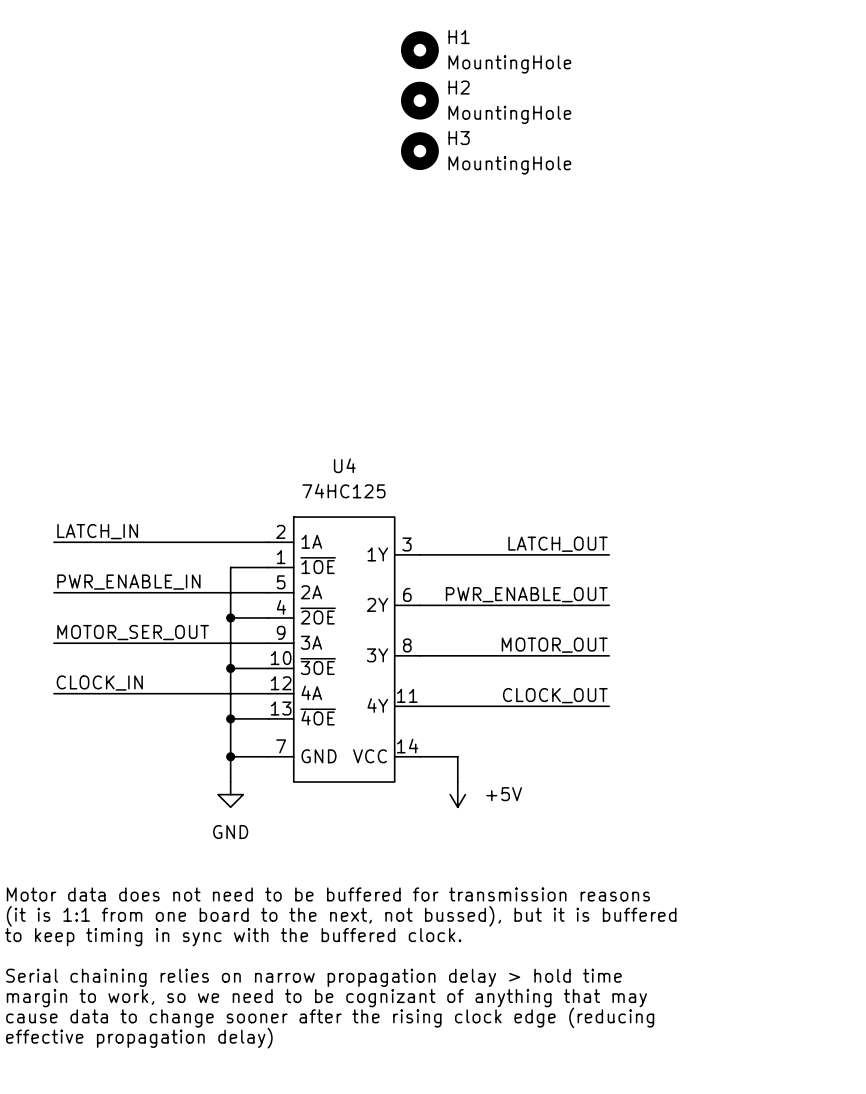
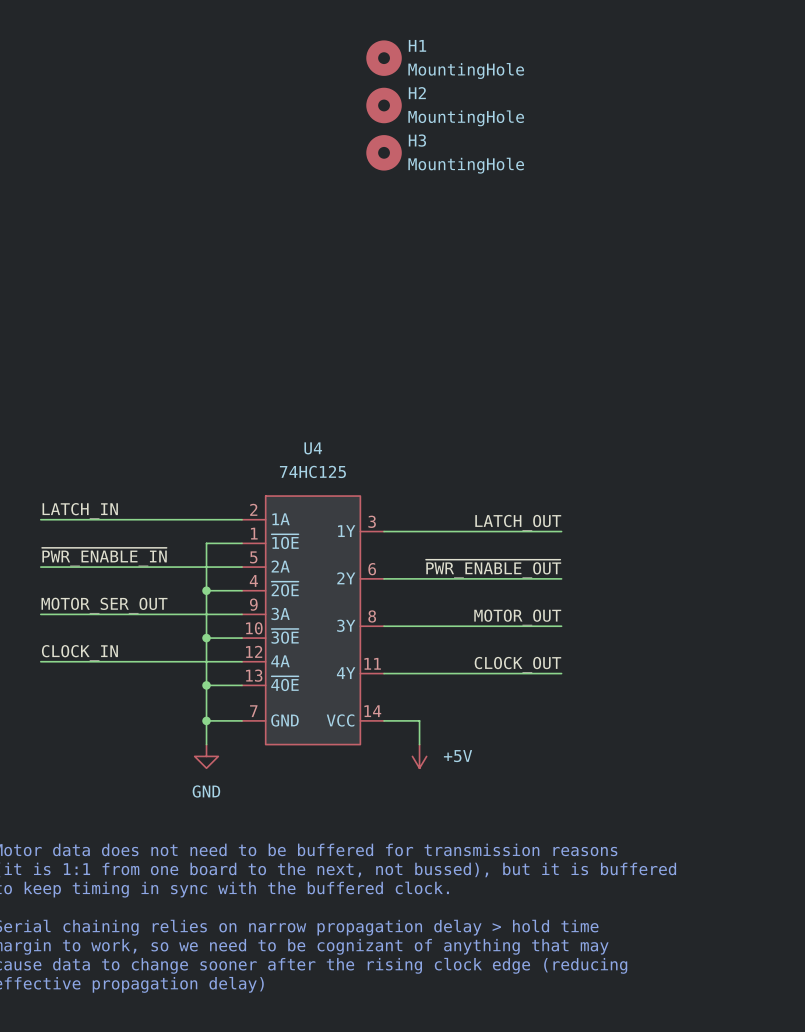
label: PWR_ENABLE_IN (128, 582) -> ~{PWR_ENABLE_IN} (104, 557)
label: PWR_ENABLE_OUT (526, 594) -> ~{PWR_ENABLE_OUT} (493, 568)

